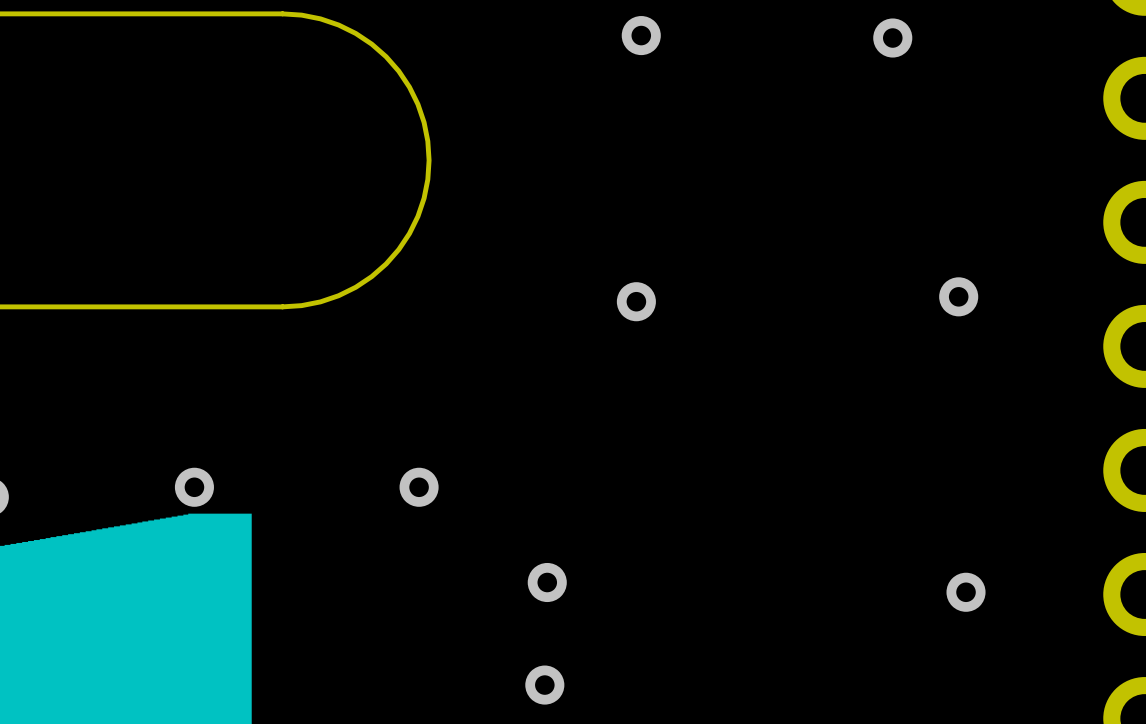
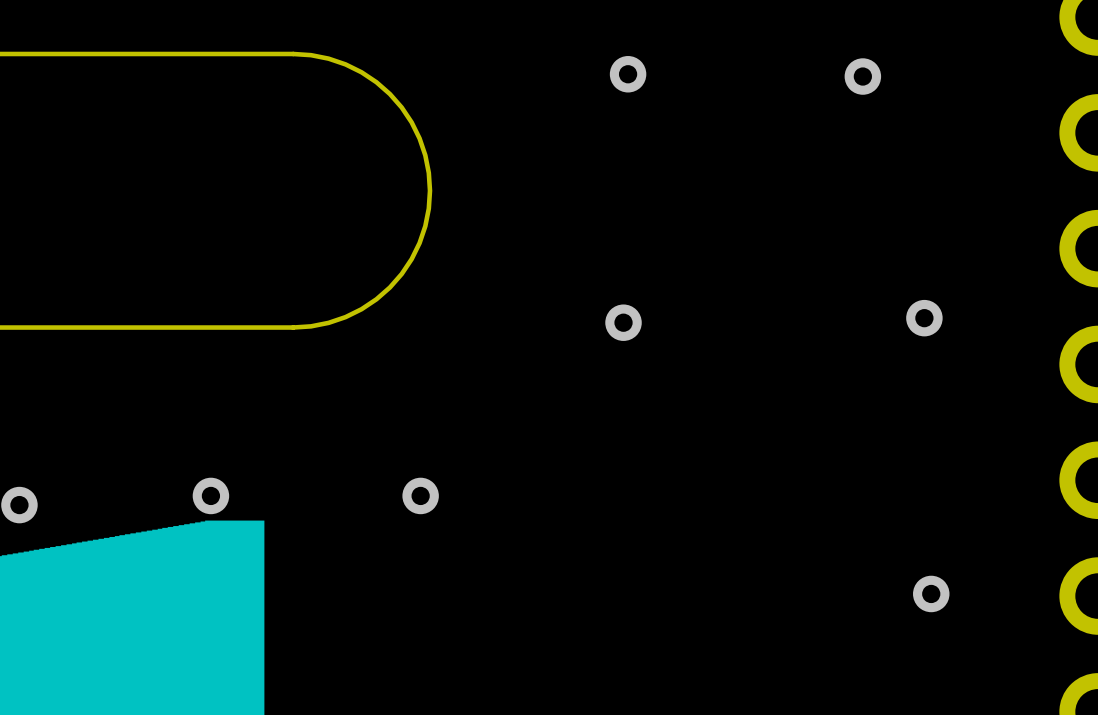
via: (547, 582) -> none
via: (544, 685) -> none

